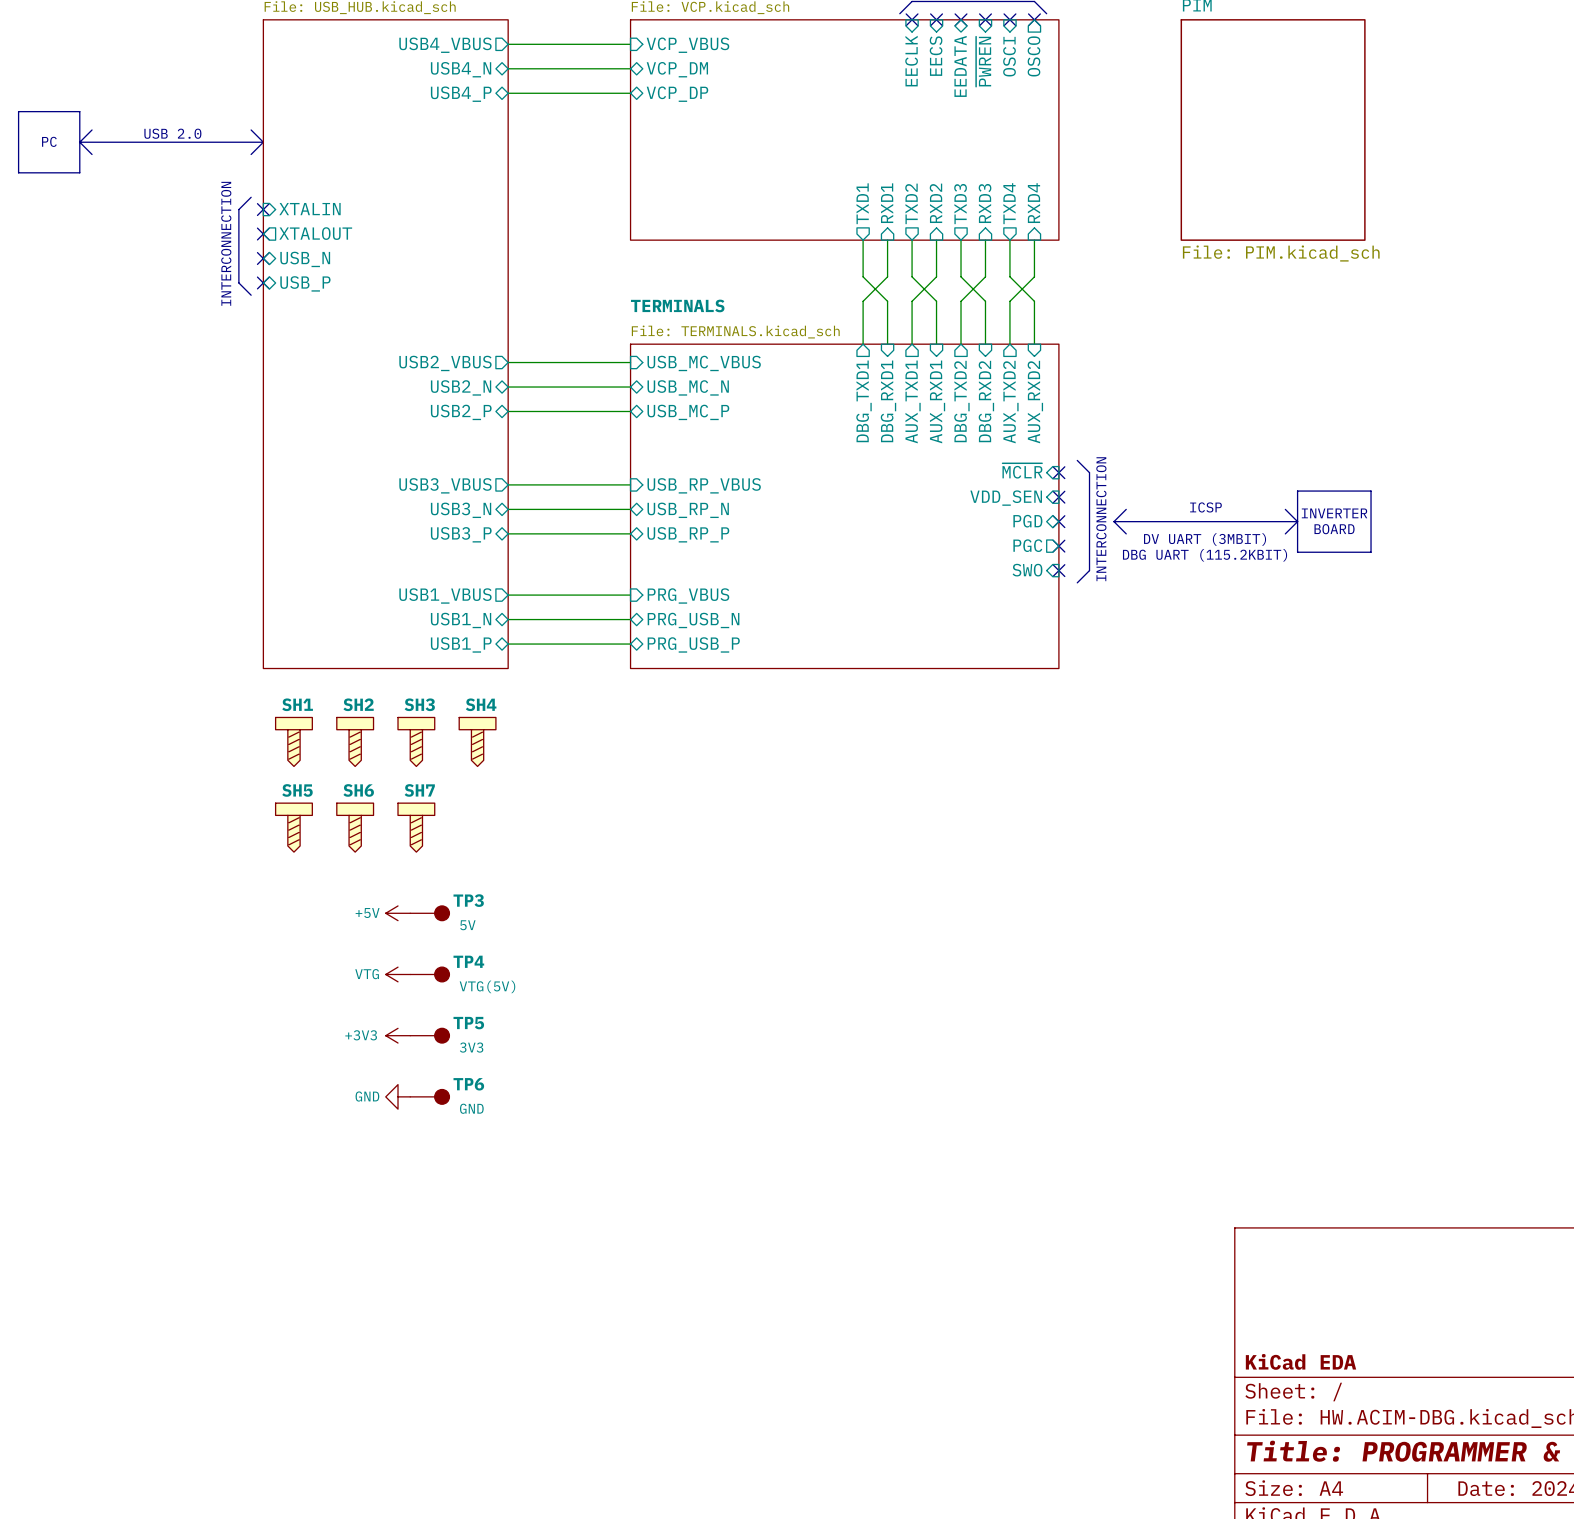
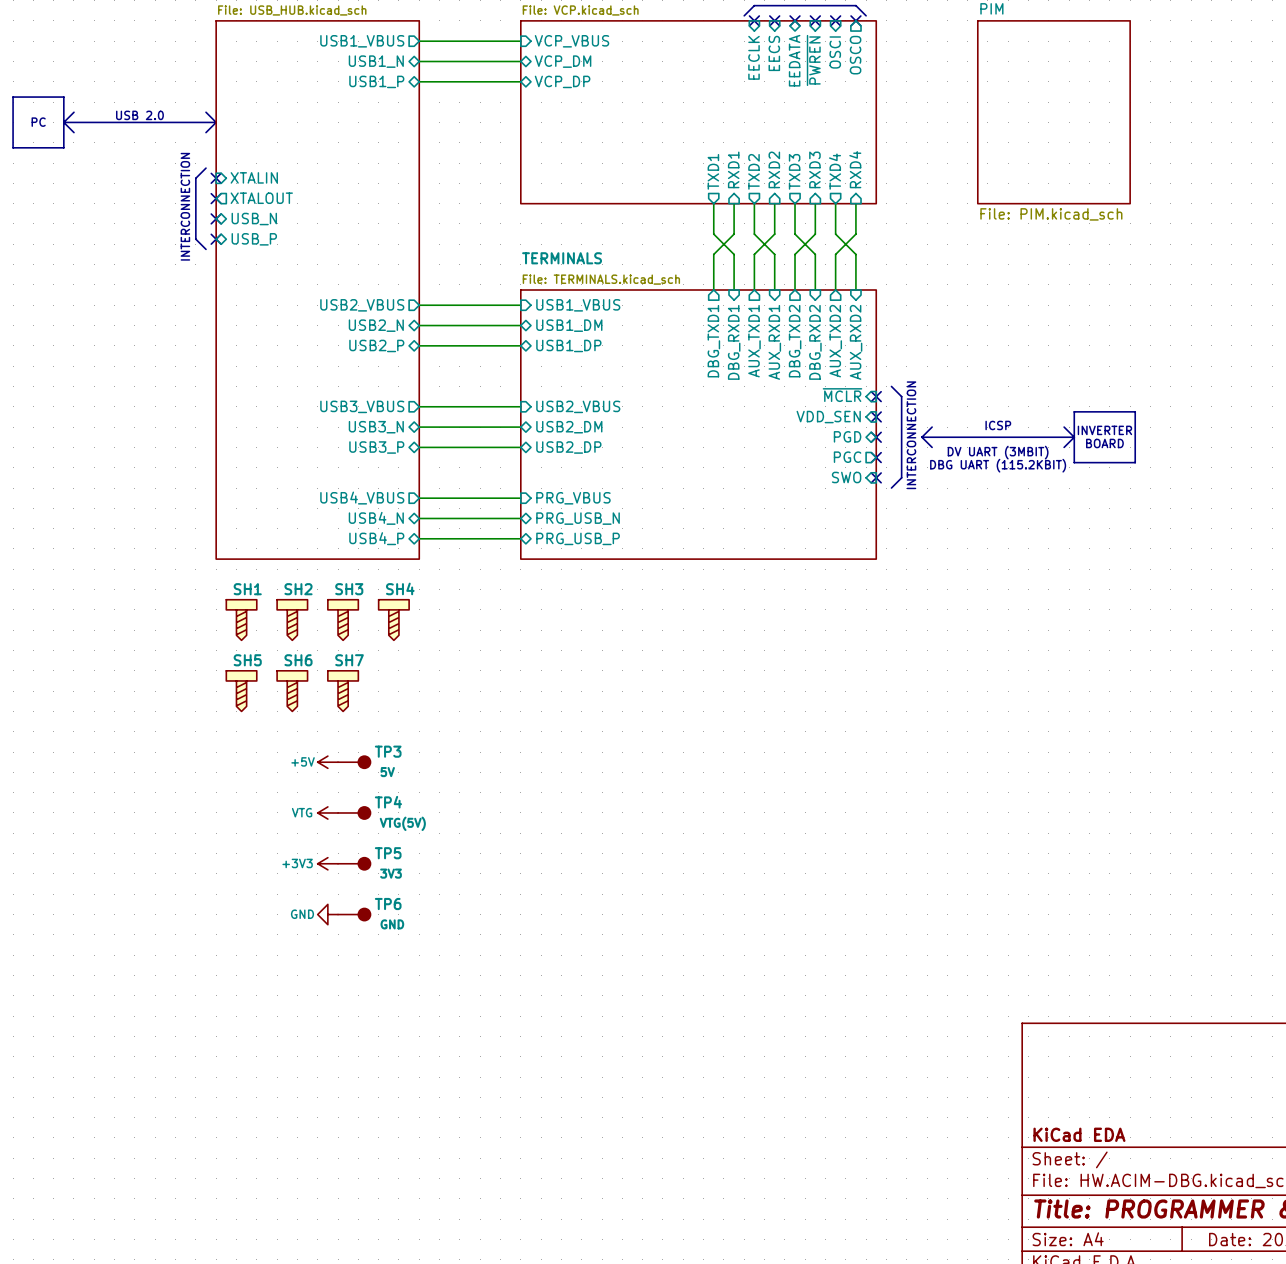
sheet pin: USB4_VBUS (445, 45) -> USB1_VBUS (362, 41)
sheet pin: USB4_N (461, 69) -> USB1_N (376, 61)
sheet pin: USB4_P (461, 94) -> USB1_P (376, 81)
sheet pin: USB_MC_VBUS (704, 363) -> USB1_VBUS (578, 305)
sheet pin: USB_MC_N (688, 387) -> USB1_DM (569, 325)
sheet pin: USB_MC_P (688, 412) -> USB1_DP (568, 345)
sheet pin: USB_RP_VBUS (704, 485) -> USB2_VBUS (578, 406)
sheet pin: USB_RP_N (688, 510) -> USB2_DM (569, 427)
sheet pin: USB_RP_P (688, 534) -> USB2_DP (568, 447)
sheet pin: USB1_VBUS (445, 595) -> USB4_VBUS (362, 498)
sheet pin: USB1_N (461, 620) -> USB4_N (376, 518)
sheet pin: USB1_P (461, 644) -> USB4_P (376, 538)

